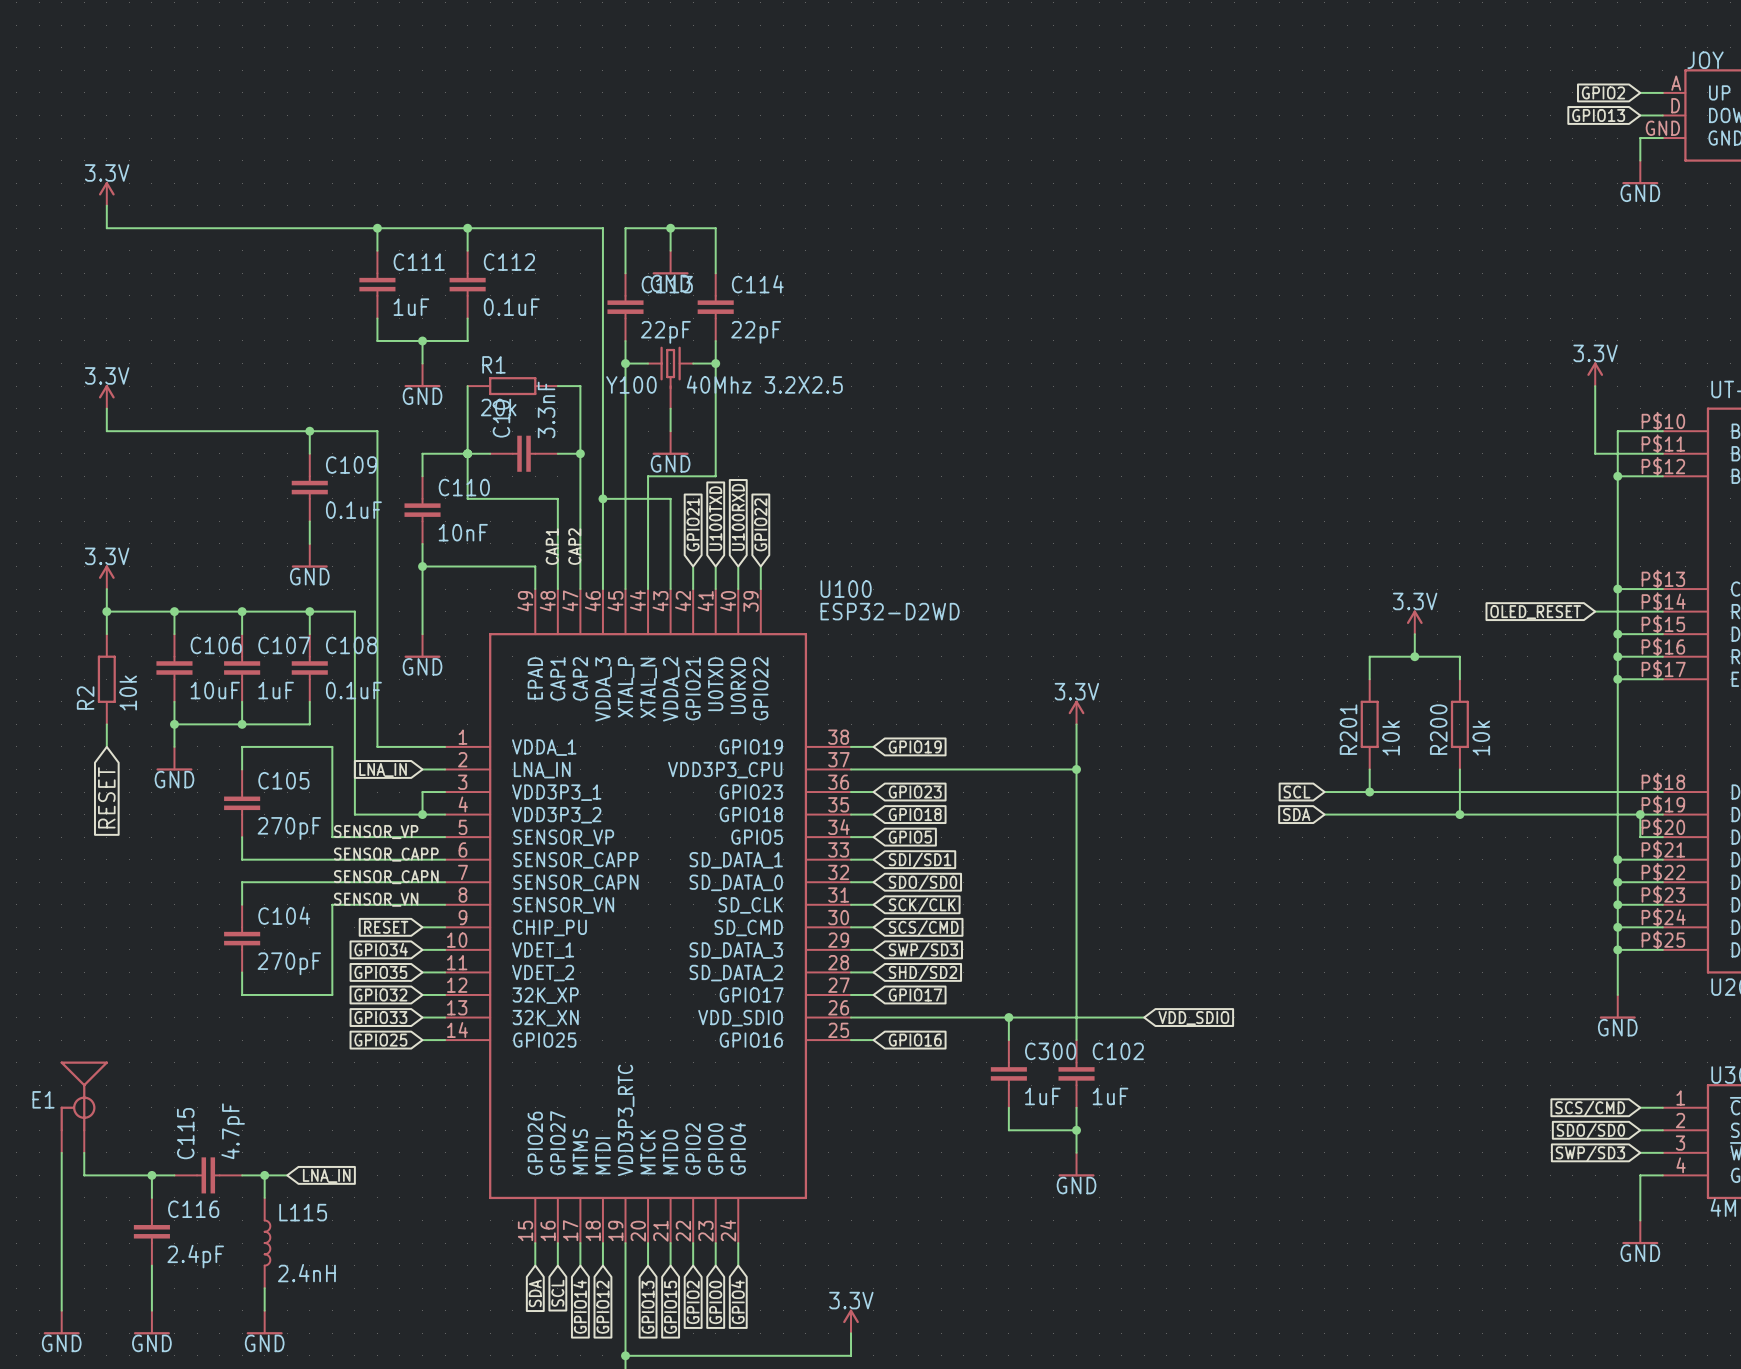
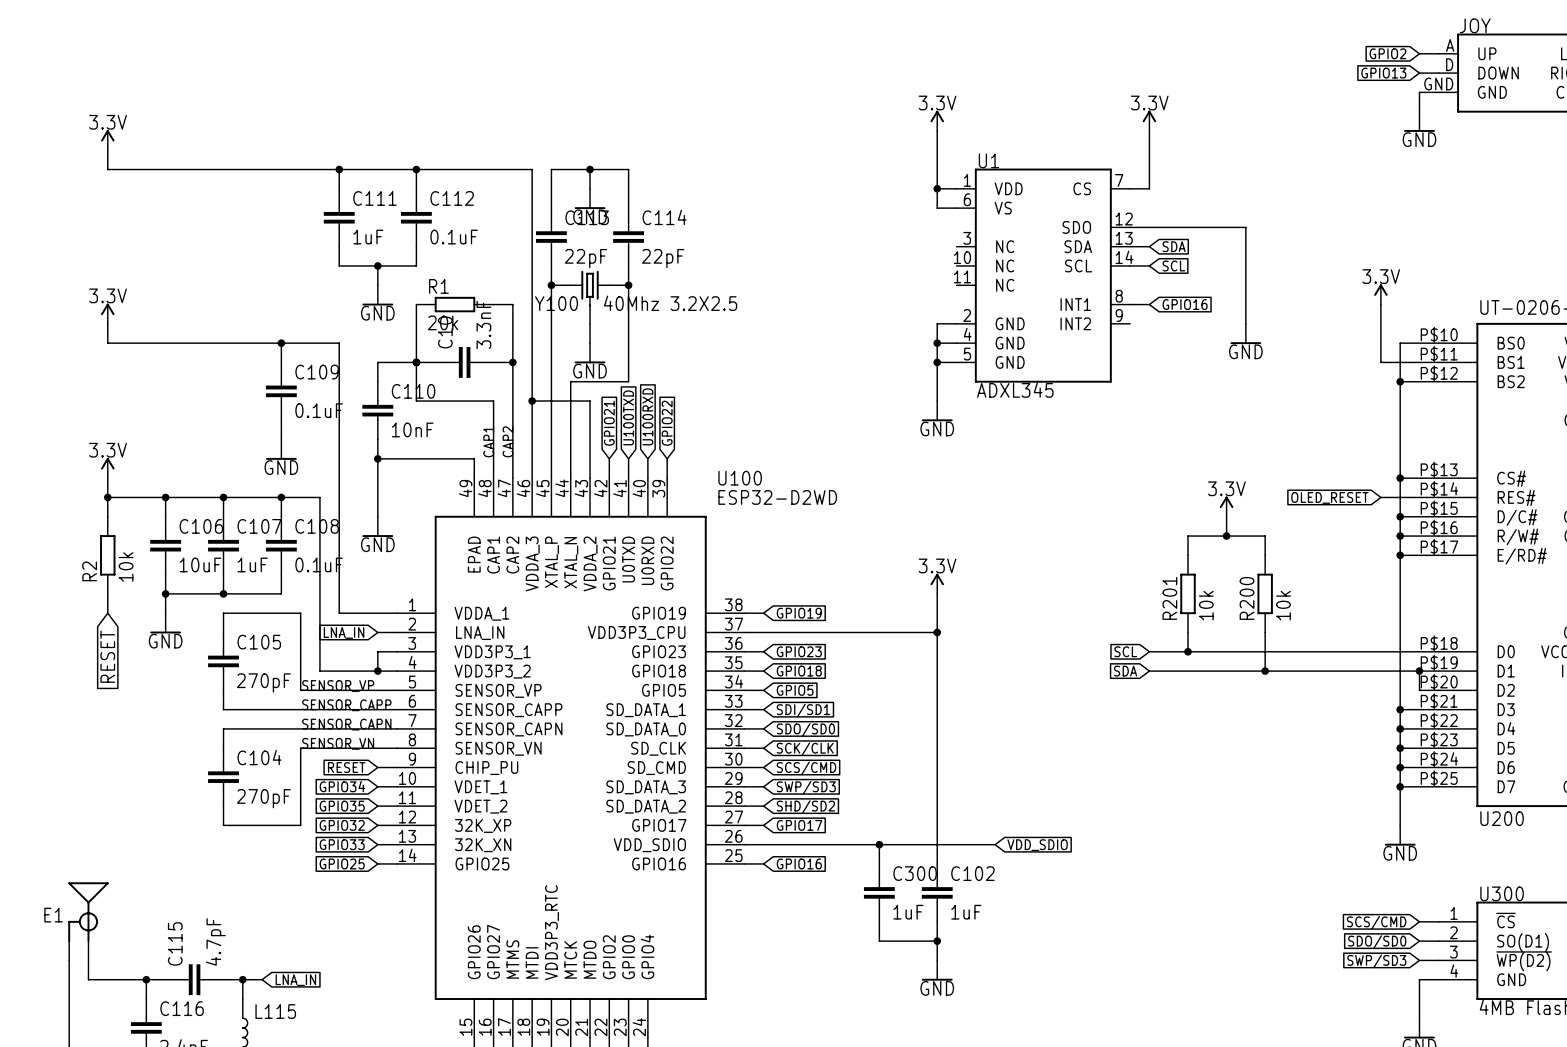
power symbol: none -> 3.3V (937, 120)
power symbol: none -> 3.3V (1149, 120)
wire: none -> (937, 130) (937, 208) (956, 208)
wire: none -> (1149, 130) (1149, 188) (1130, 188)
wire: none -> (937, 188) (956, 188)
junction: none -> (937, 188)
wire: none -> (1130, 227) (1245, 227) (1245, 323)
wire: none -> (1130, 246) (1149, 246)
global label: none -> SDA (1174, 246)
wire: none -> (1130, 265) (1149, 265)
global label: none -> SCL (1173, 265)
U1: none -> ADXL345 (1043, 275)
wire: none -> (1130, 304) (1149, 304)
global label: none -> GPIO16 (1185, 304)
wire: none -> (956, 323) (937, 323) (937, 401)
power symbol: none -> GND (1245, 333)
wire: none -> (937, 343) (956, 343)
junction: none -> (937, 343)
wire: none -> (937, 362) (956, 362)
junction: none -> (937, 362)
power symbol: none -> GND (937, 411)

